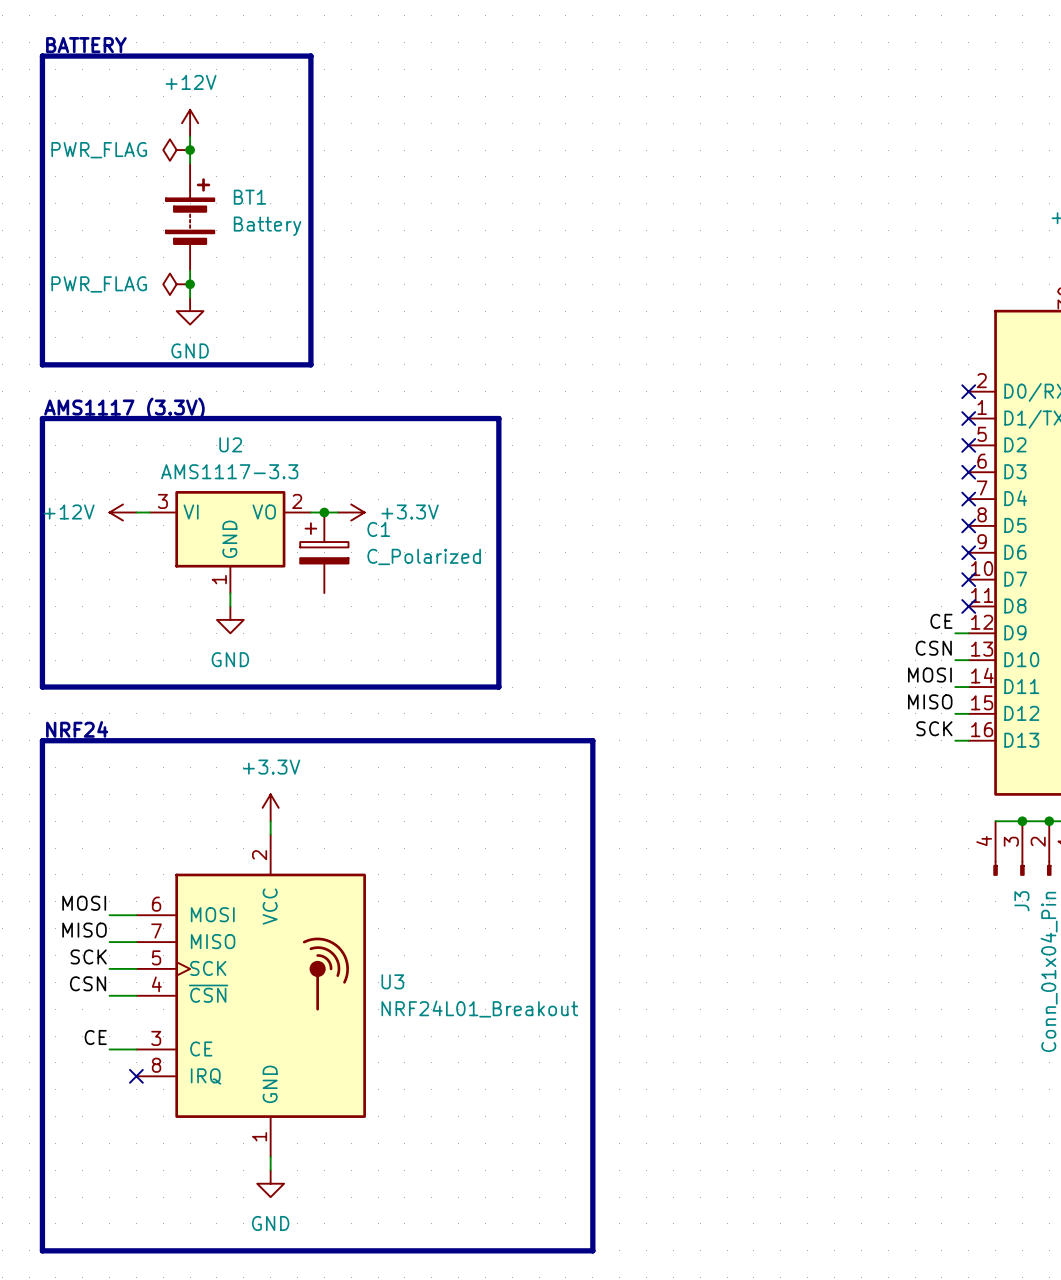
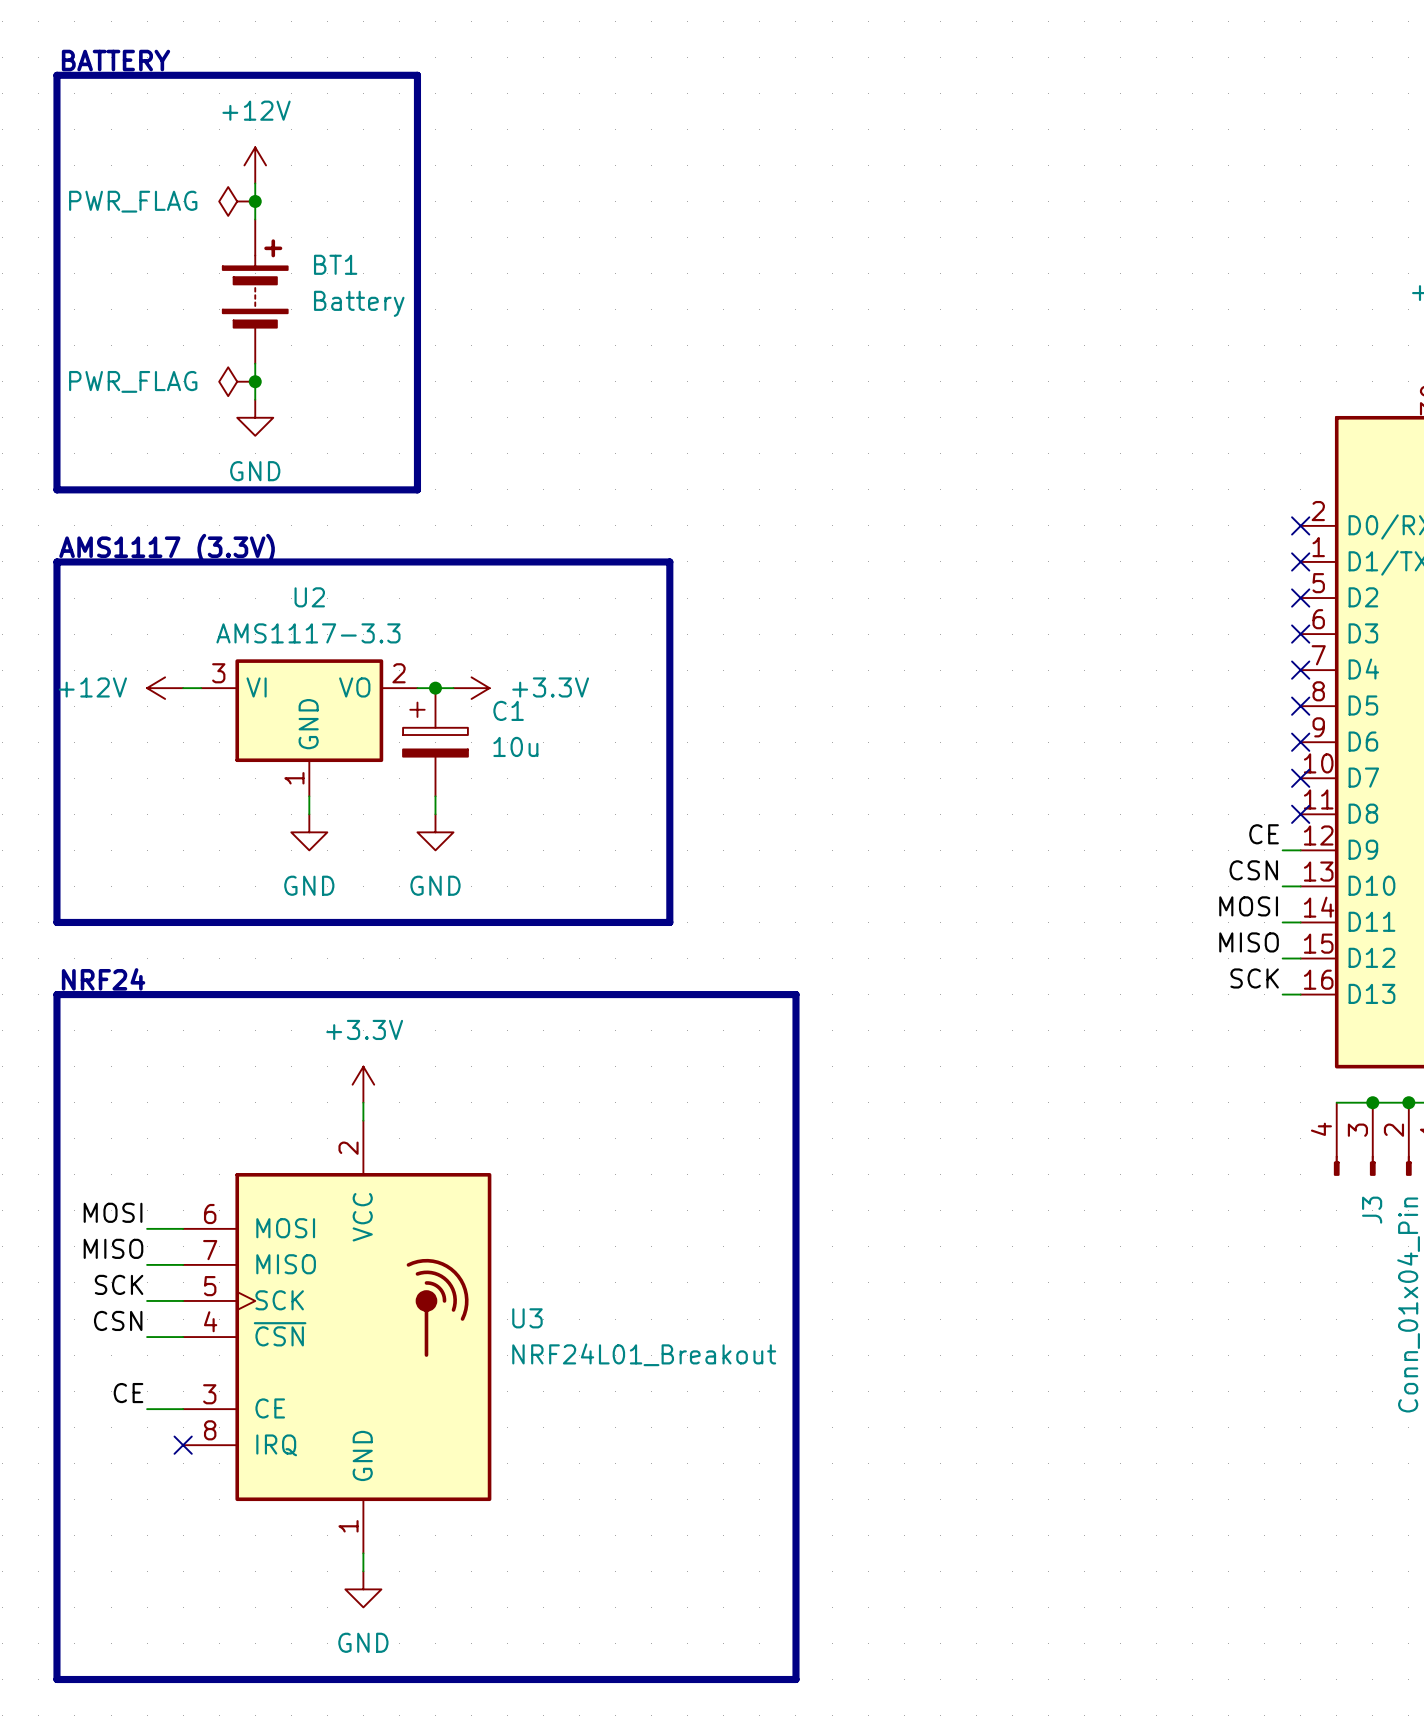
C1 value: C_Polarized (424, 556) -> 10u (515, 746)
wire: none -> (435, 796) (435, 814)
power symbol: none -> GND (435, 832)

